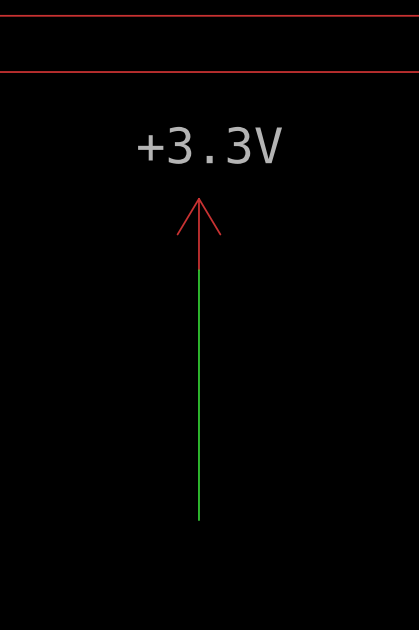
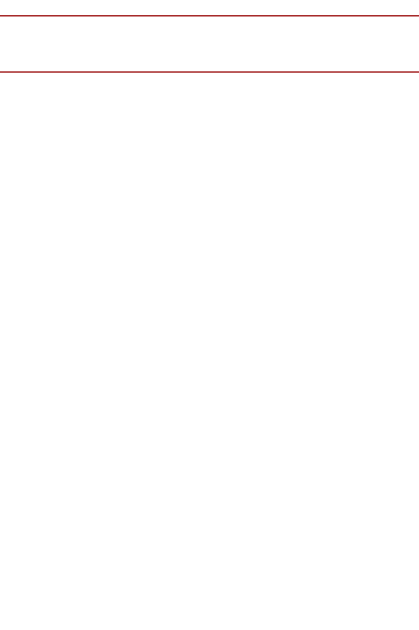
power symbol: +3.3V (198, 234) -> none
wire: (198, 270) (198, 520) -> none

